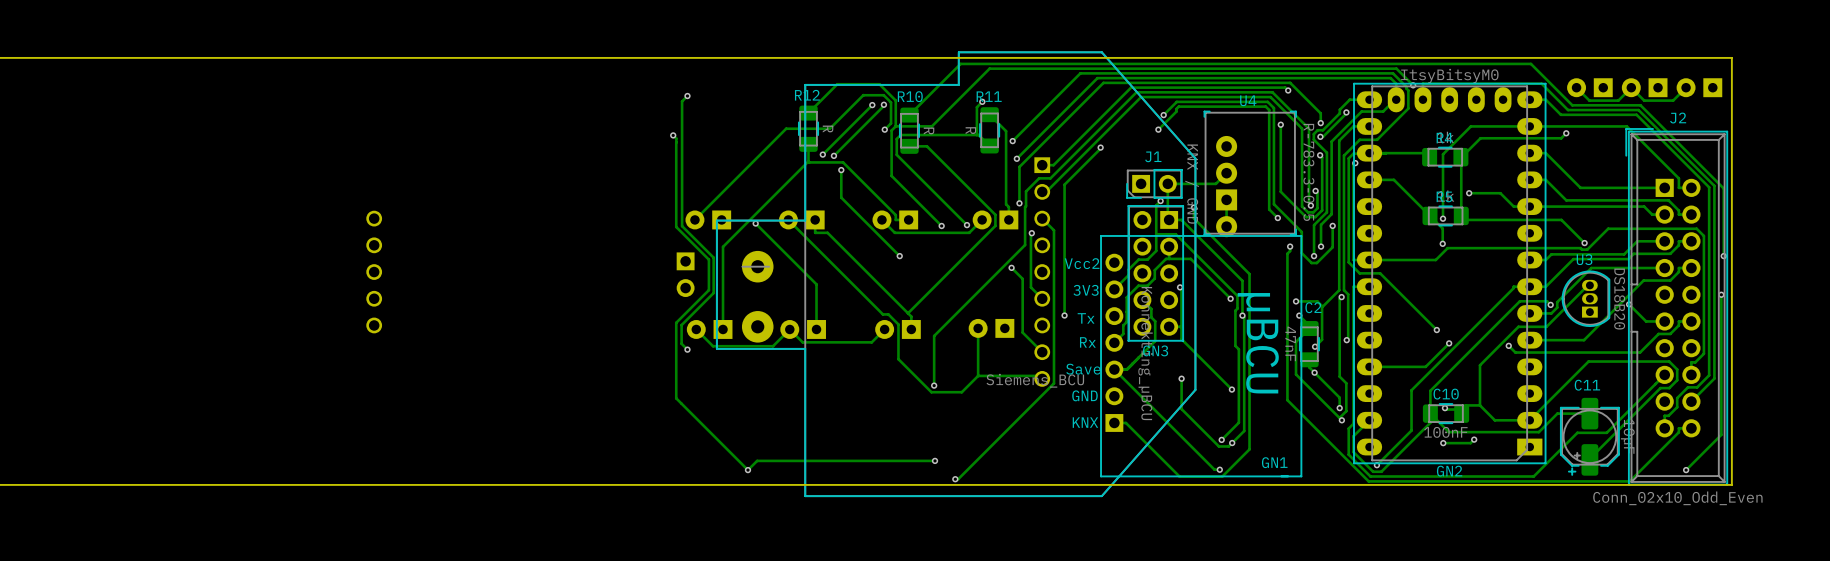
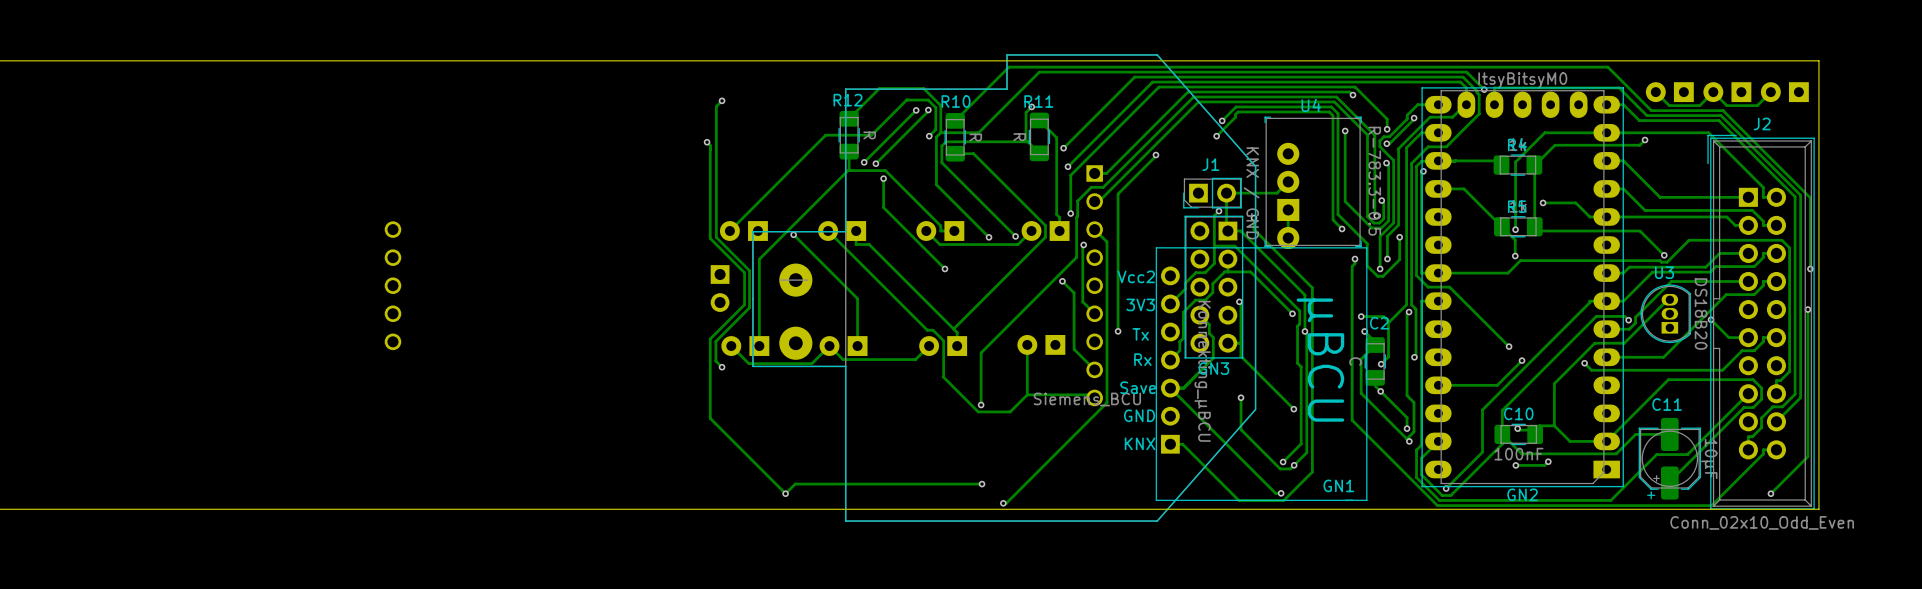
C2 value: 47nF (1290, 343) -> C (1355, 361)

